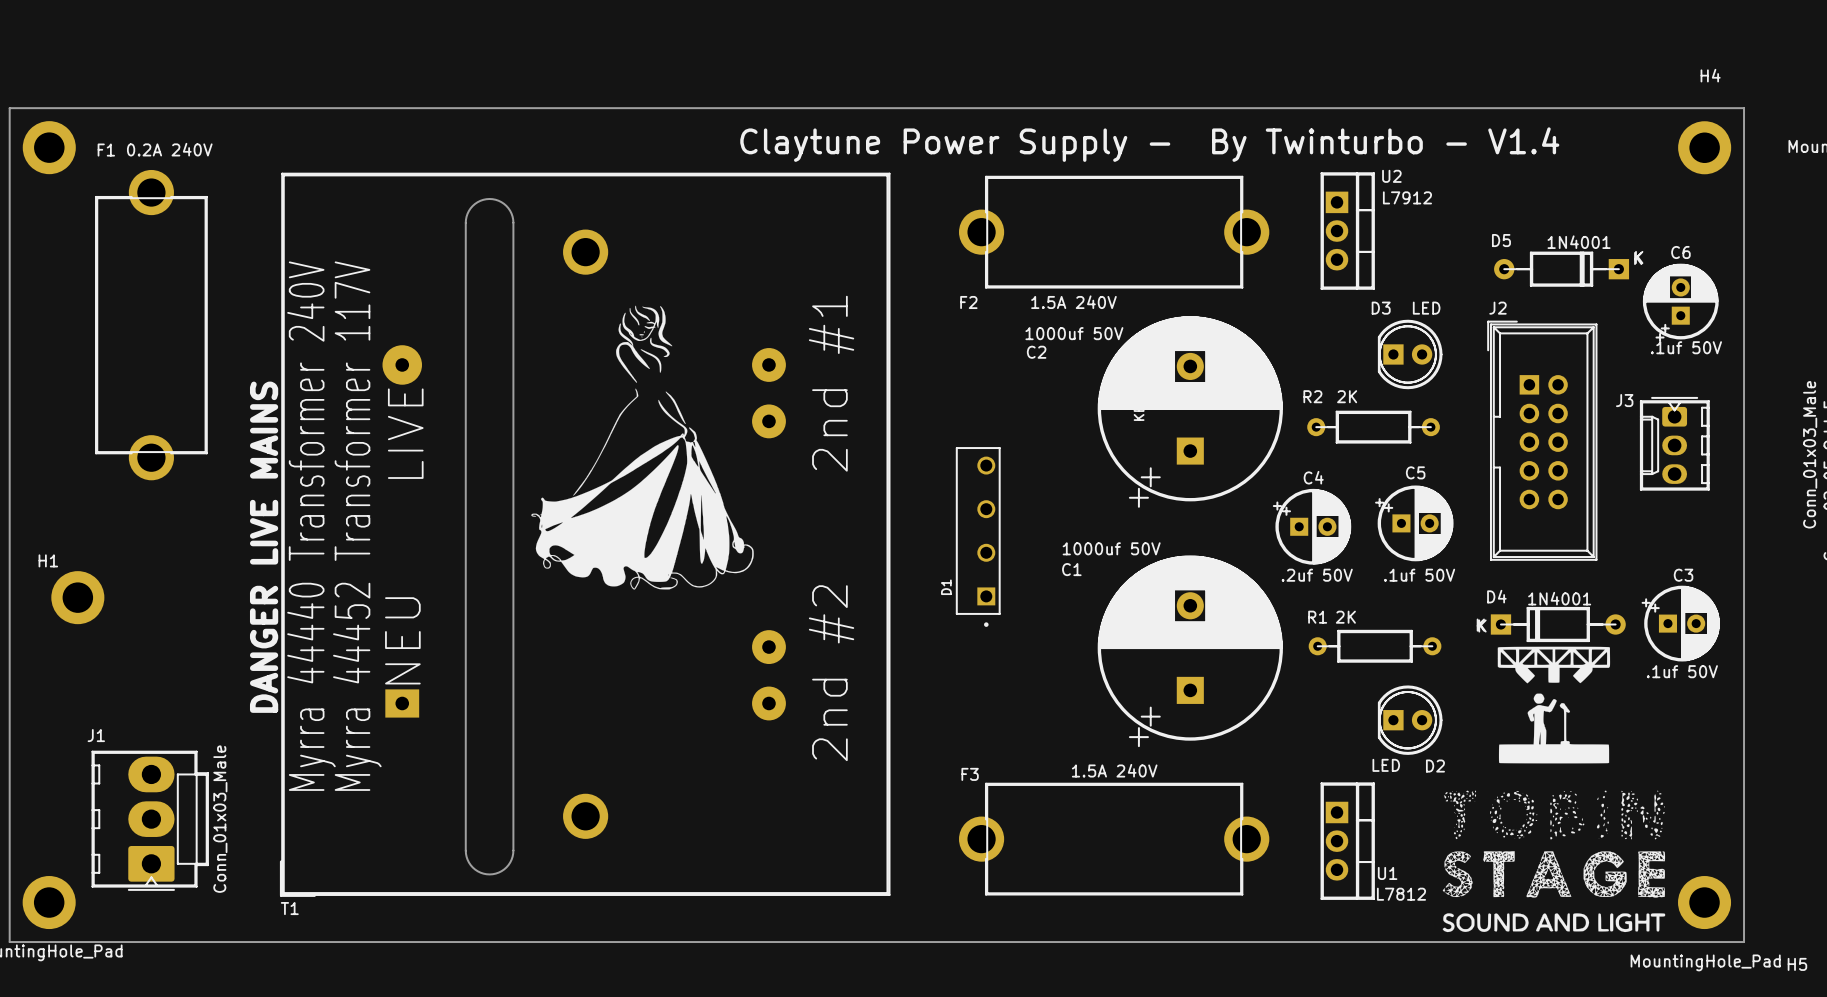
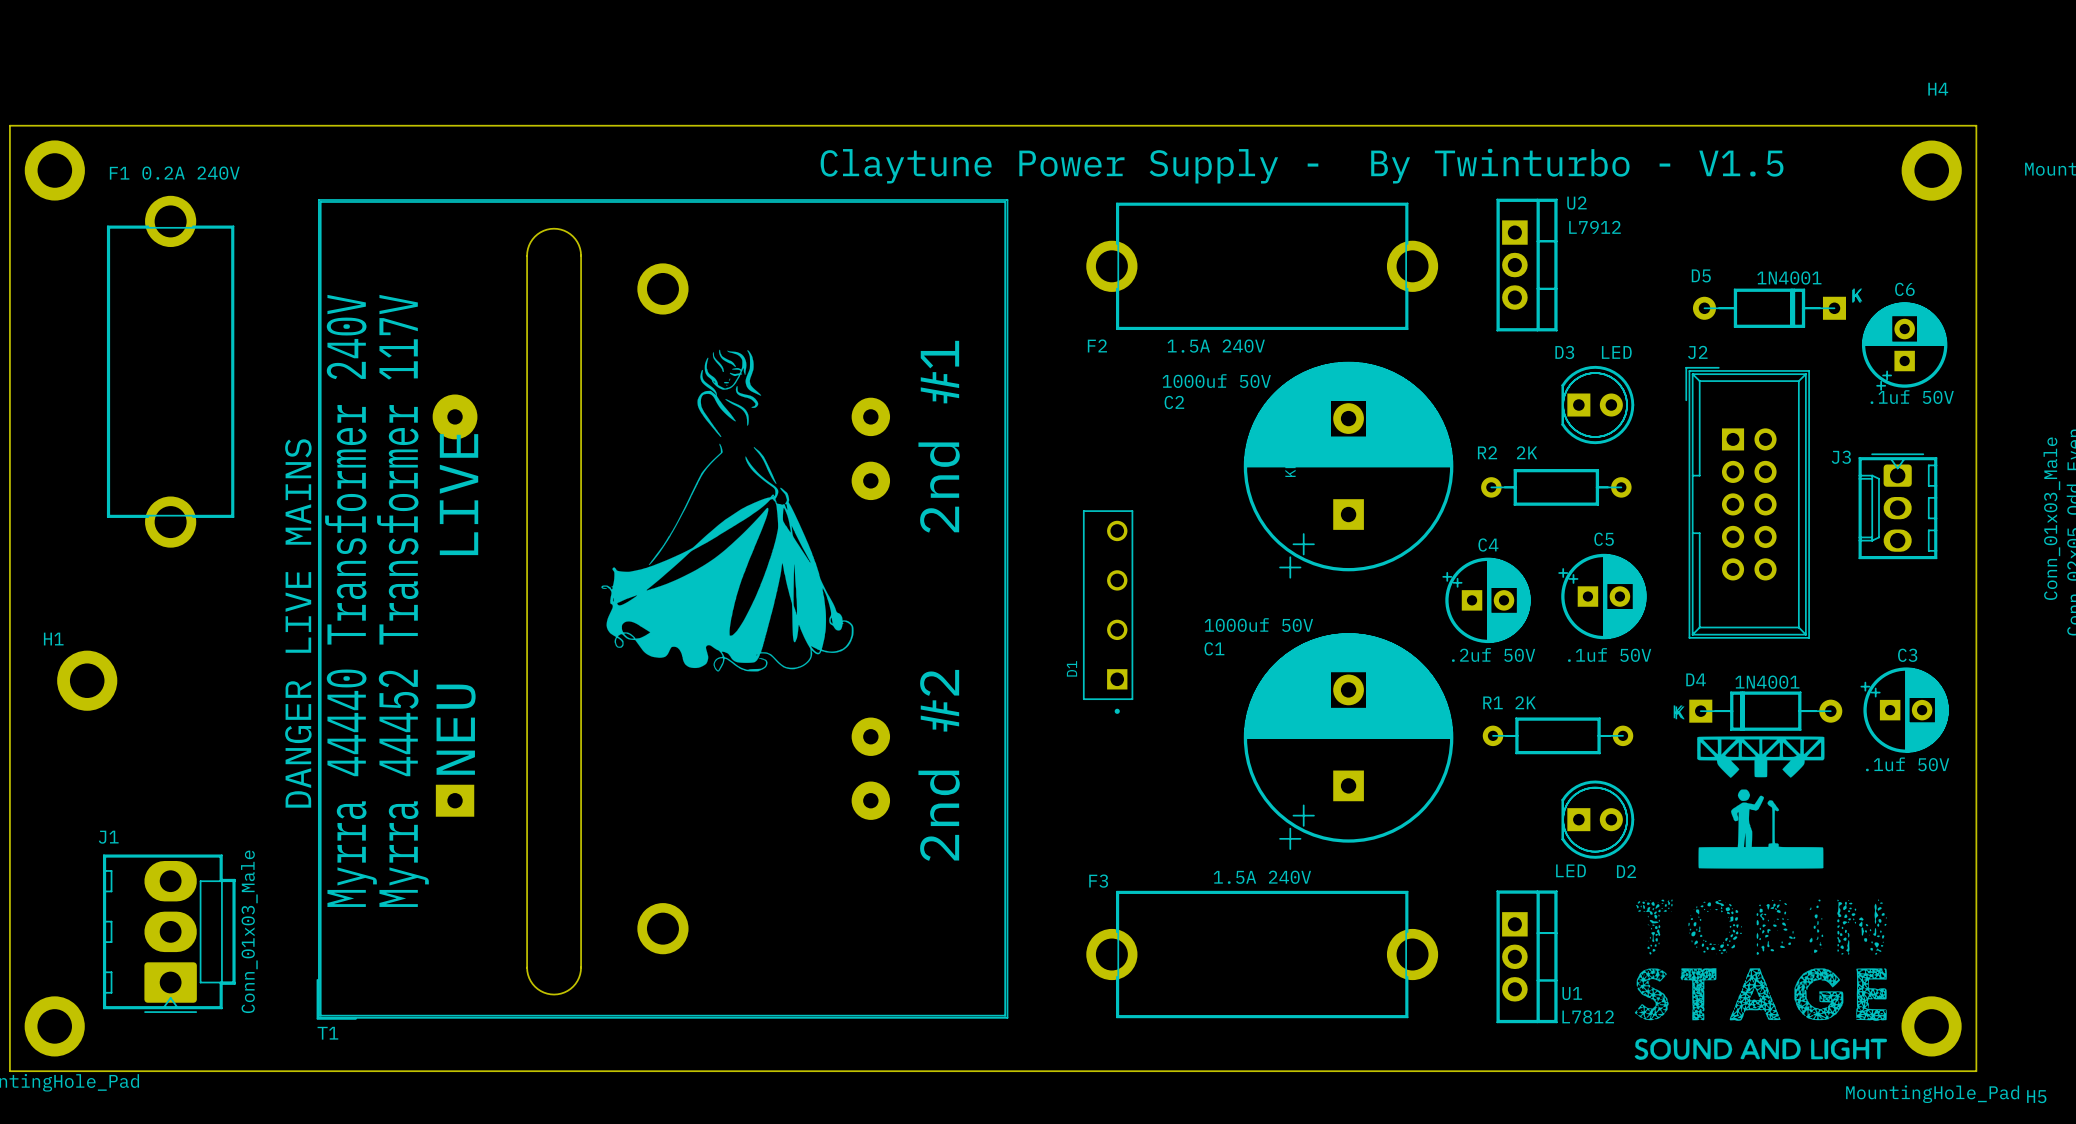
text: Claytune Power Supply - By Twinturbo - V1.4 (1149, 144) -> Claytune Power Supply - By Twinturbo - V1.5 (1302, 166)

